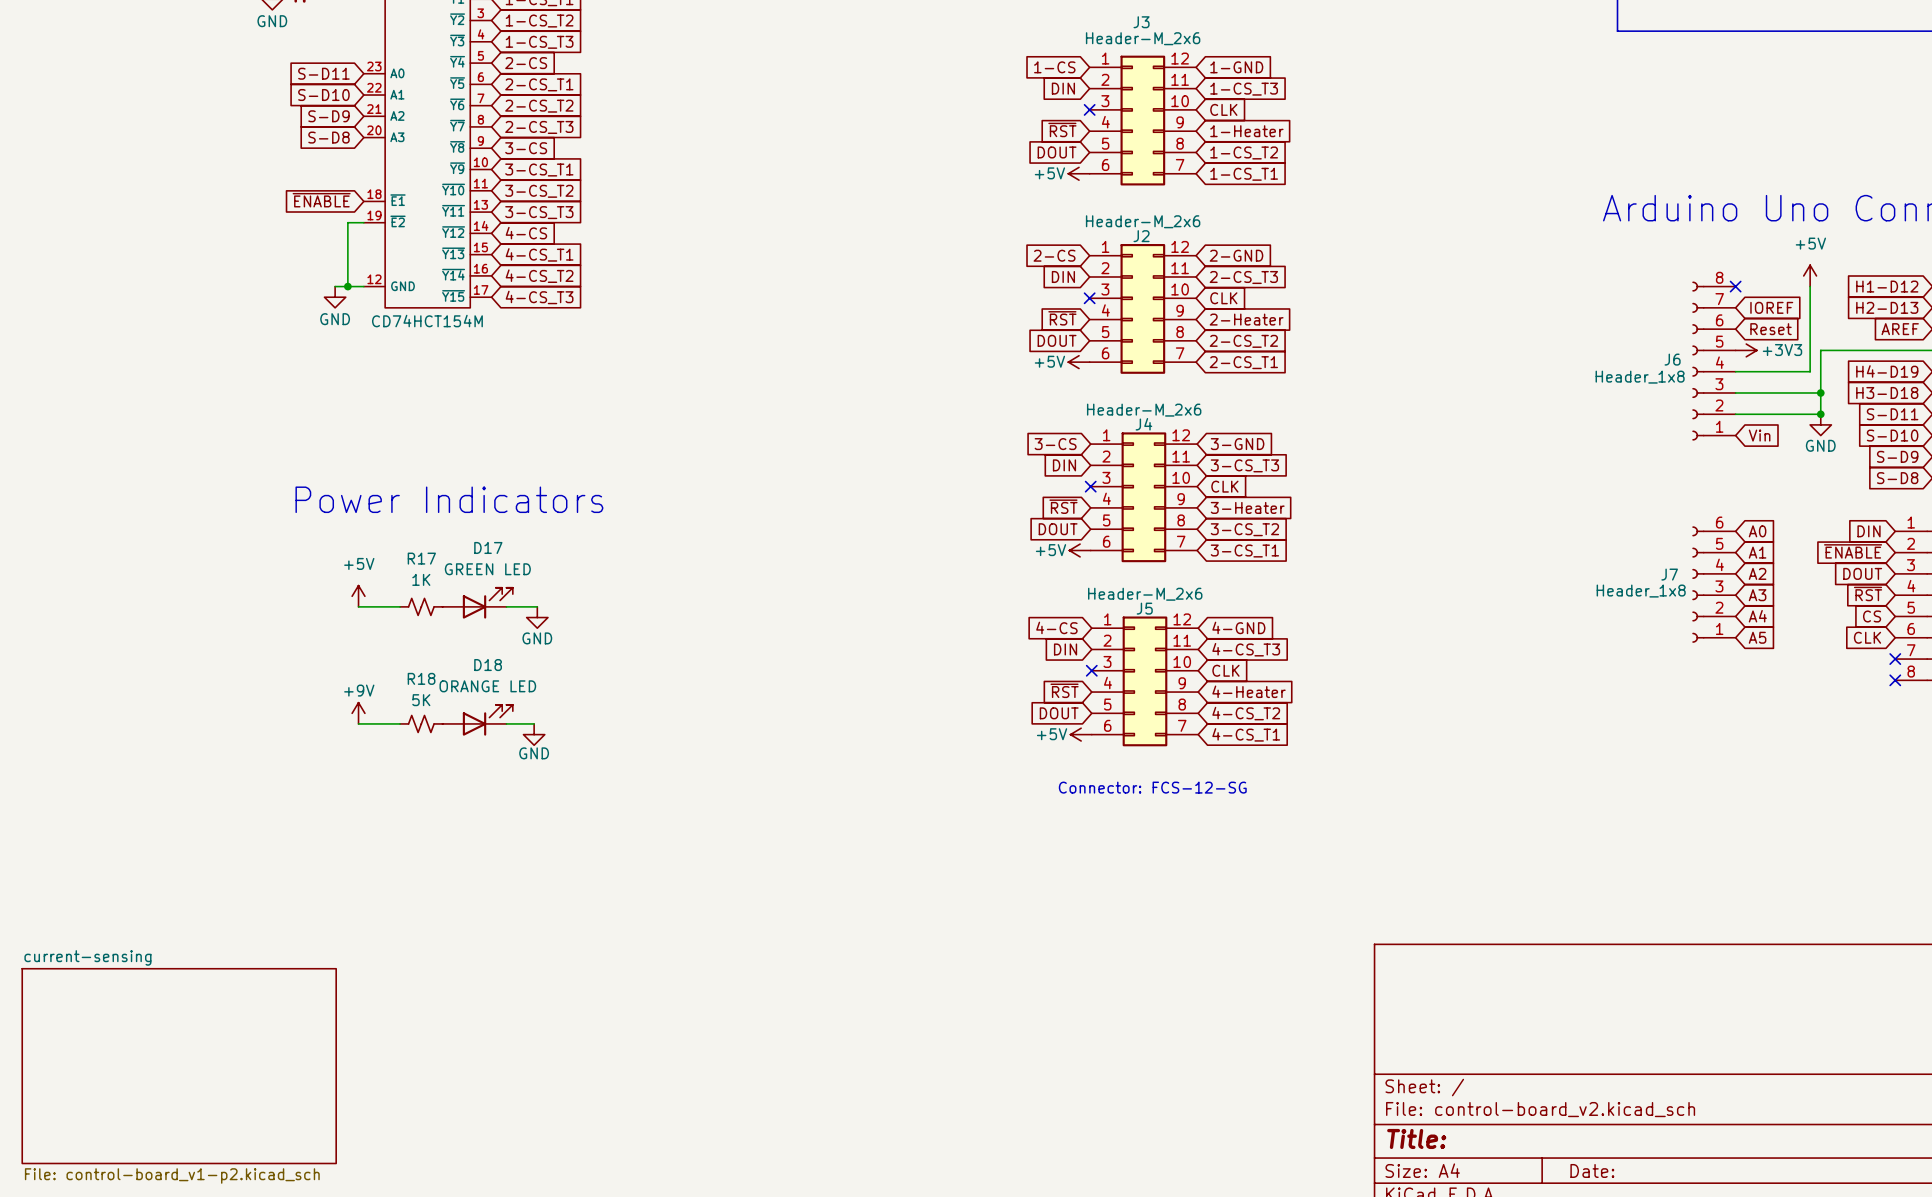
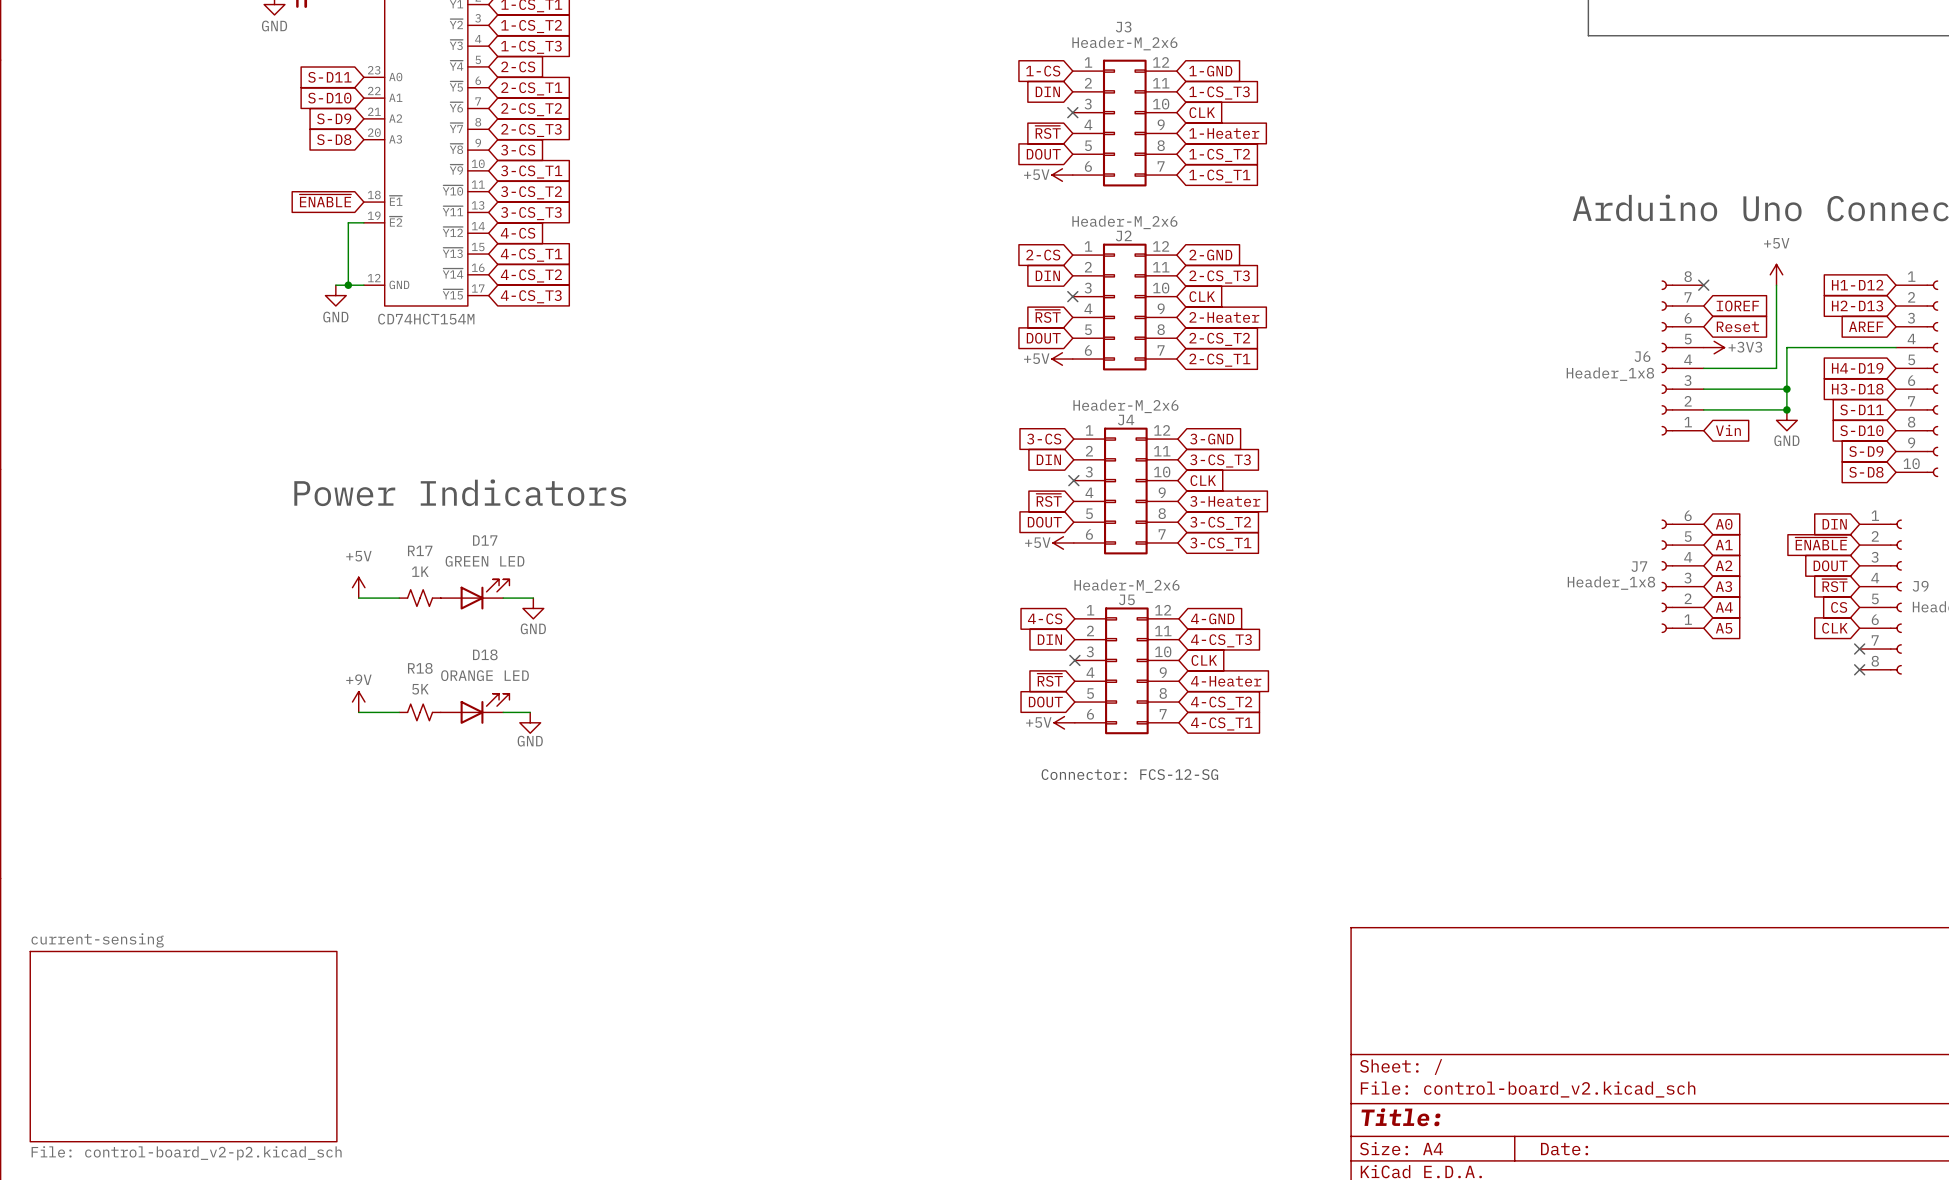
sheet current-sensing value: File: control-board_v1-p2.kicad_sch (172, 1175) -> File: control-board_v2-p2.kicad_sch (186, 1153)

